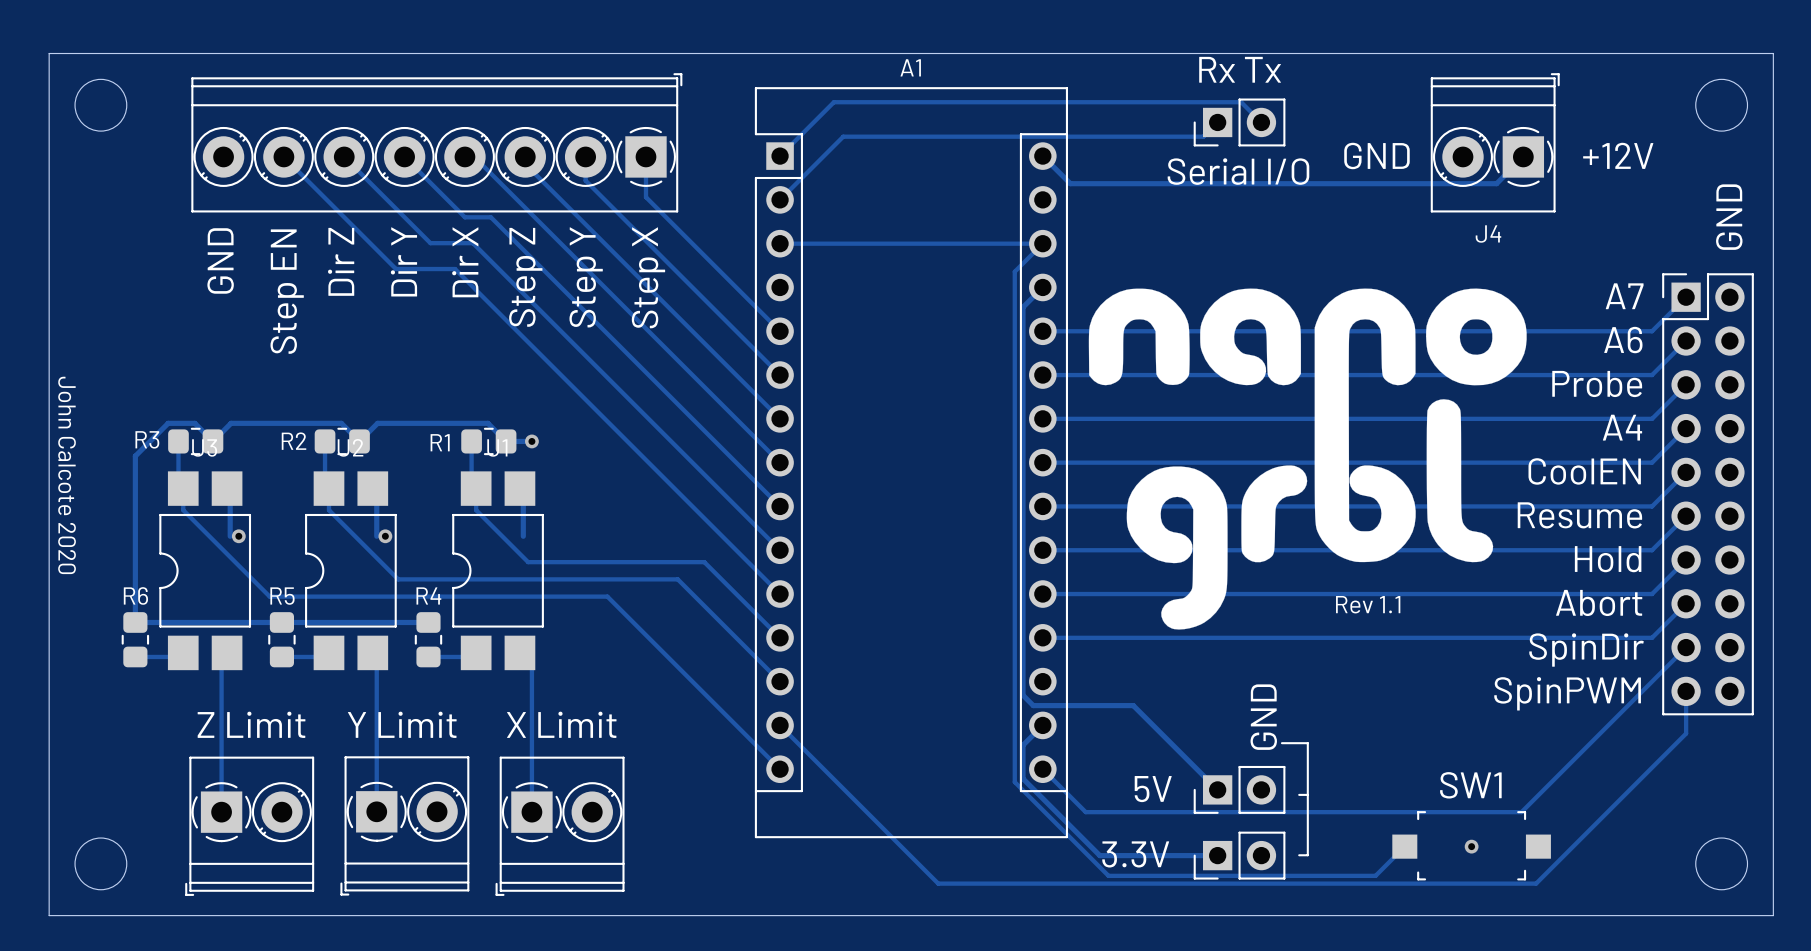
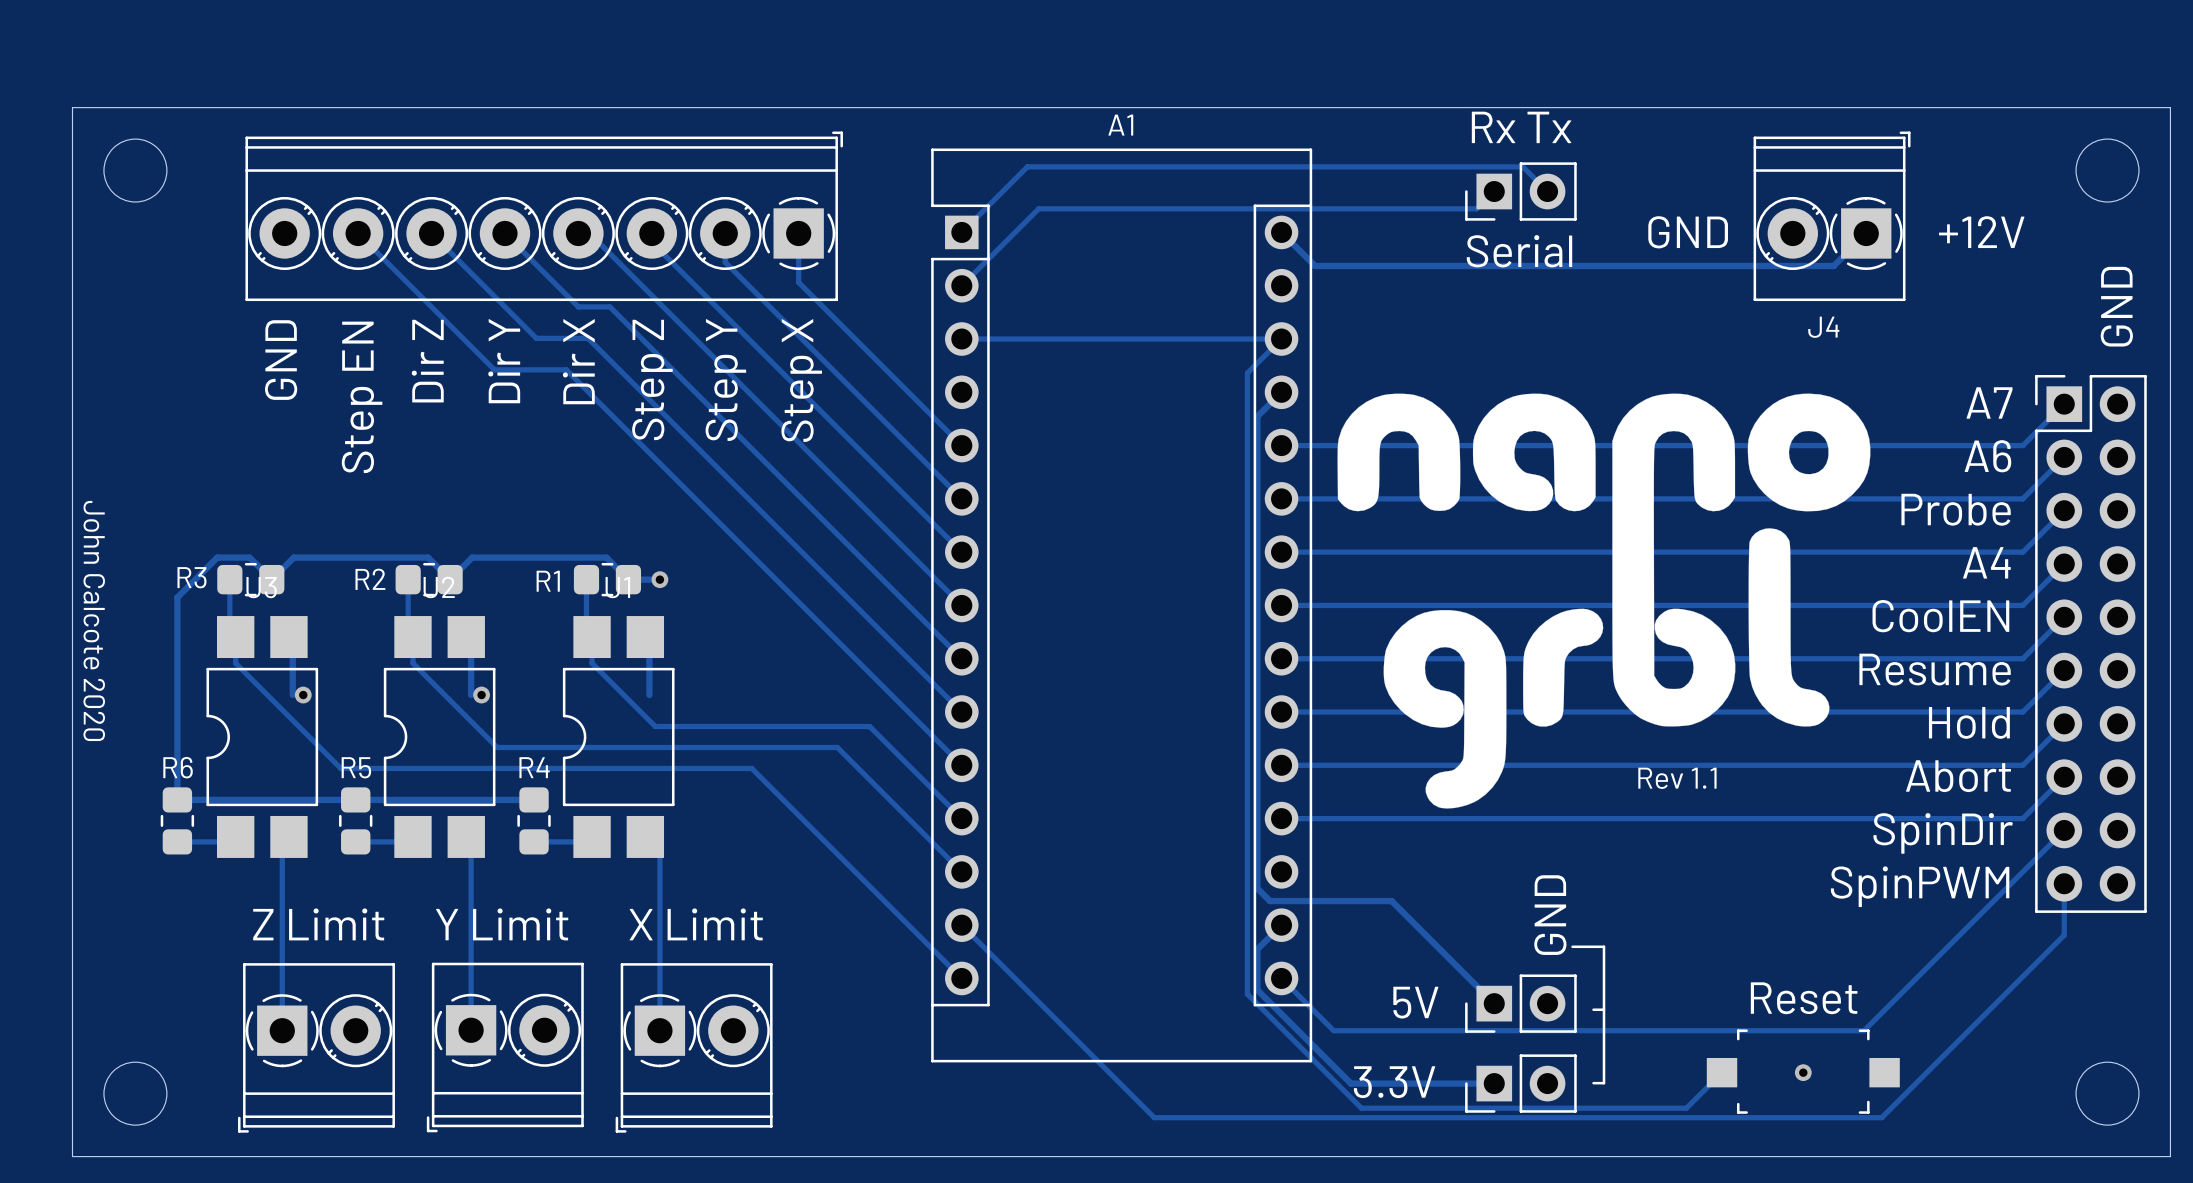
part value: Serial I/O (1238, 171) -> Serial (1519, 251)
SW1 name: SW1 (1470, 785) -> Reset (1804, 998)

